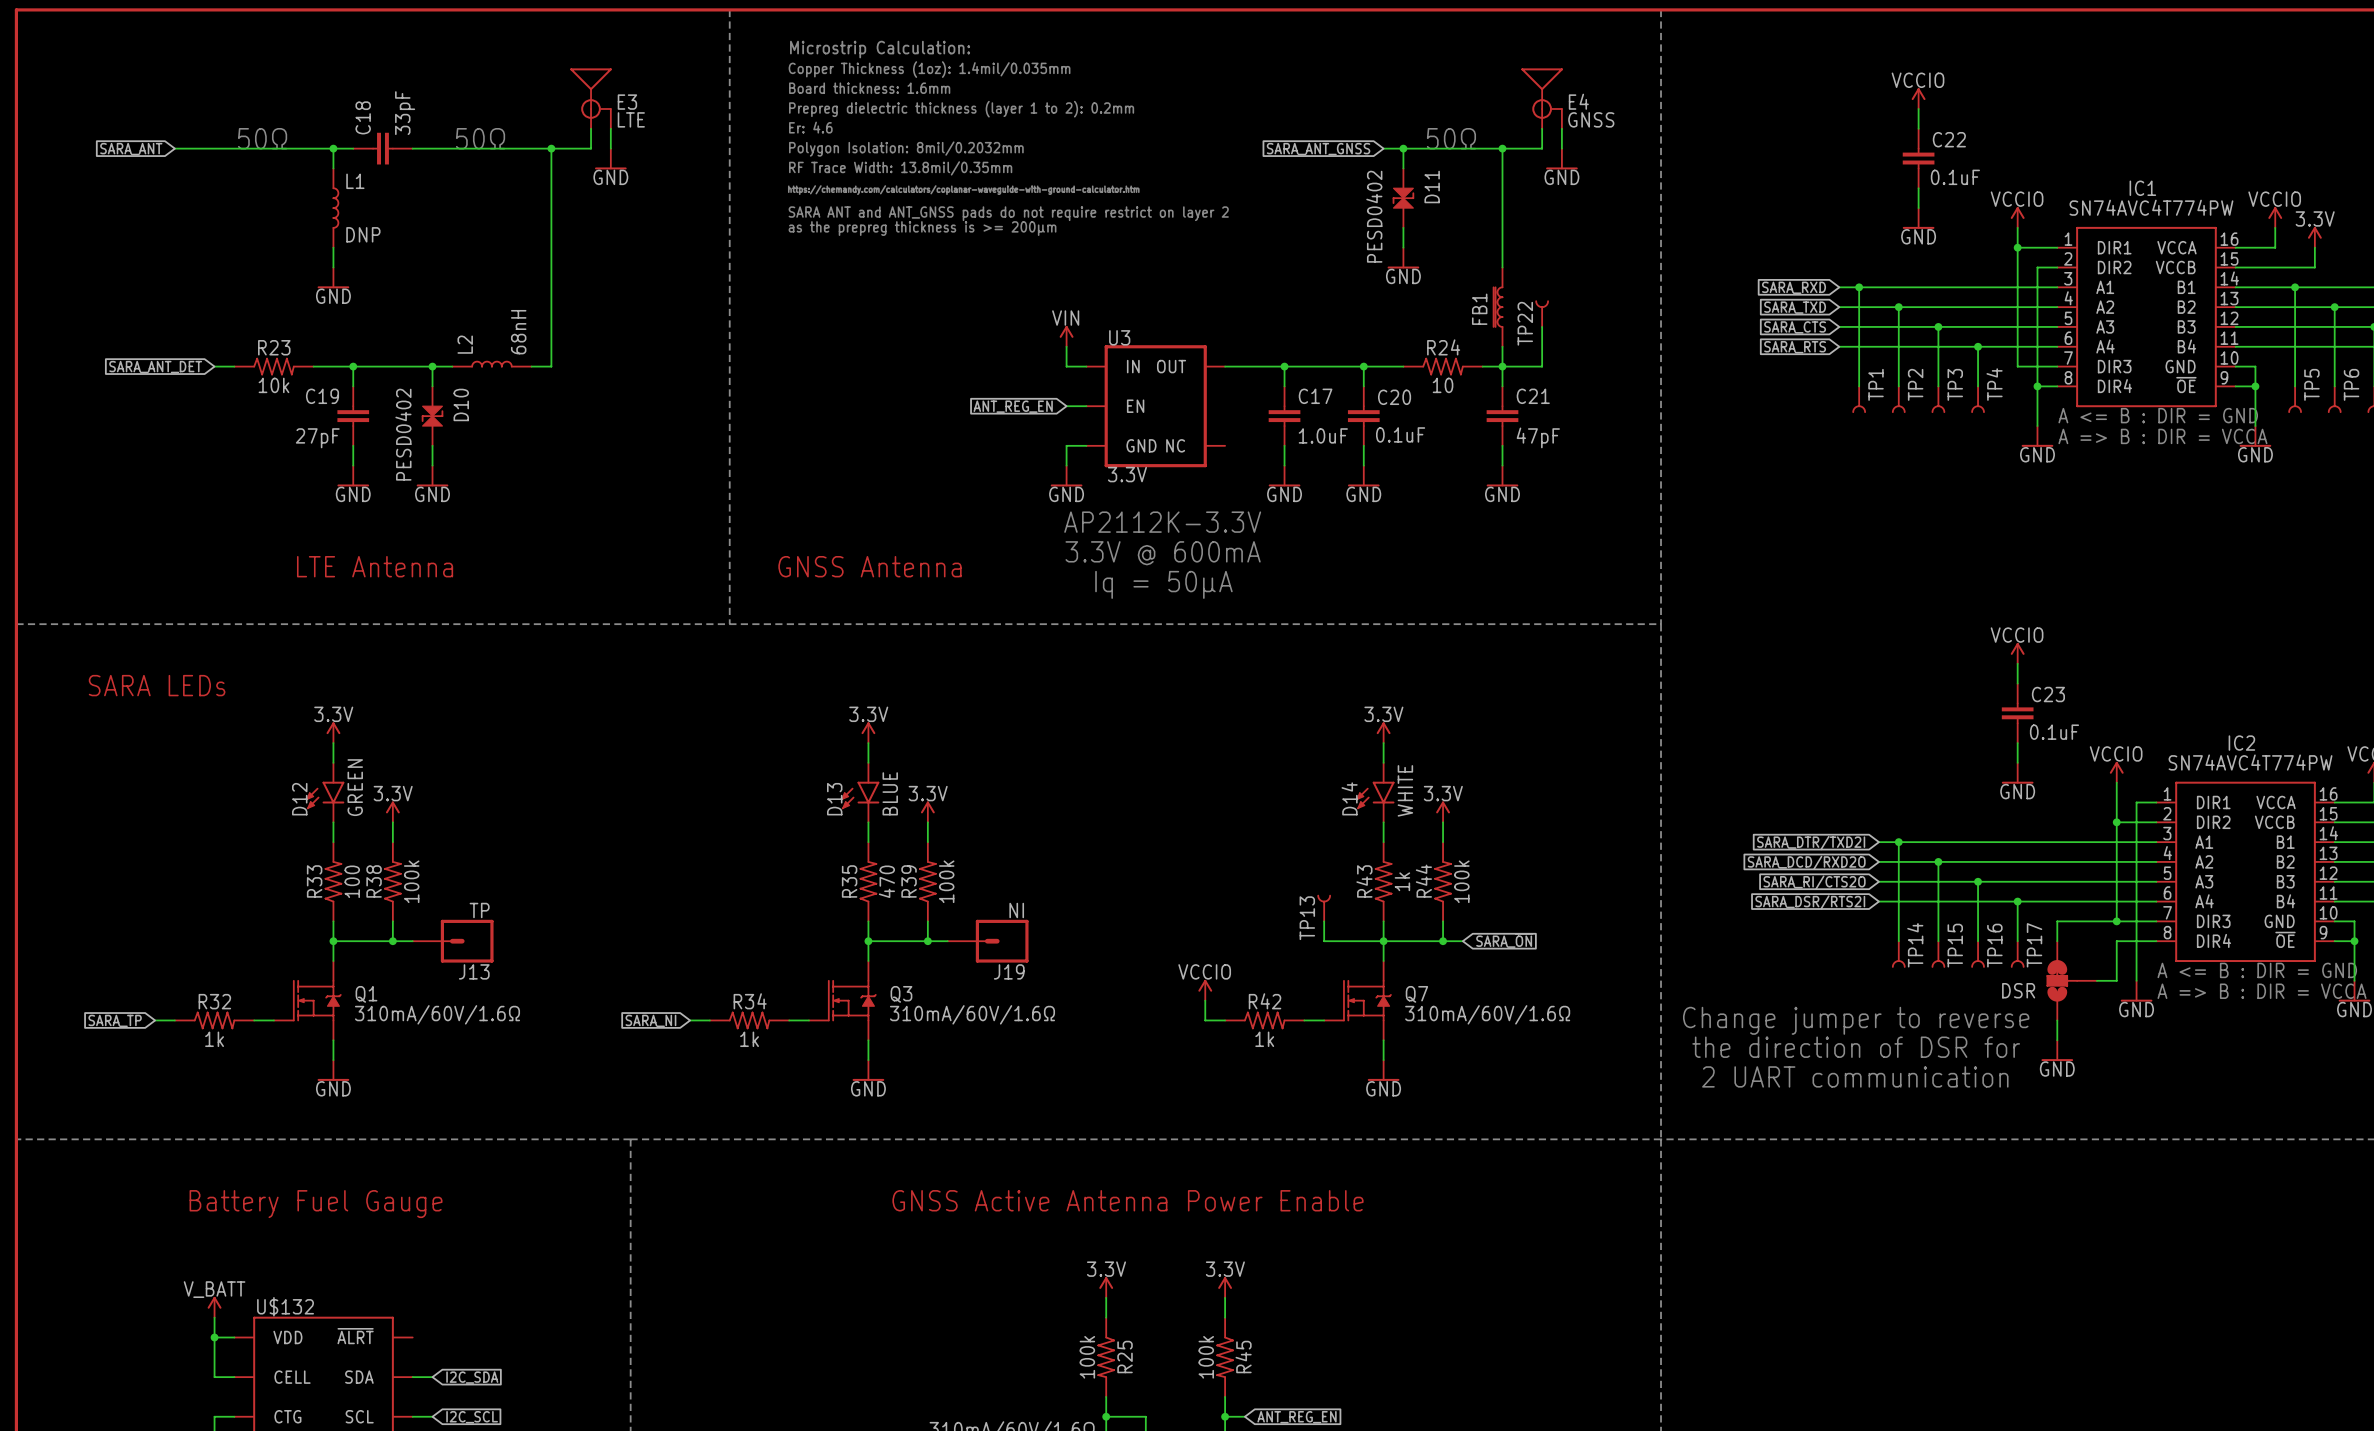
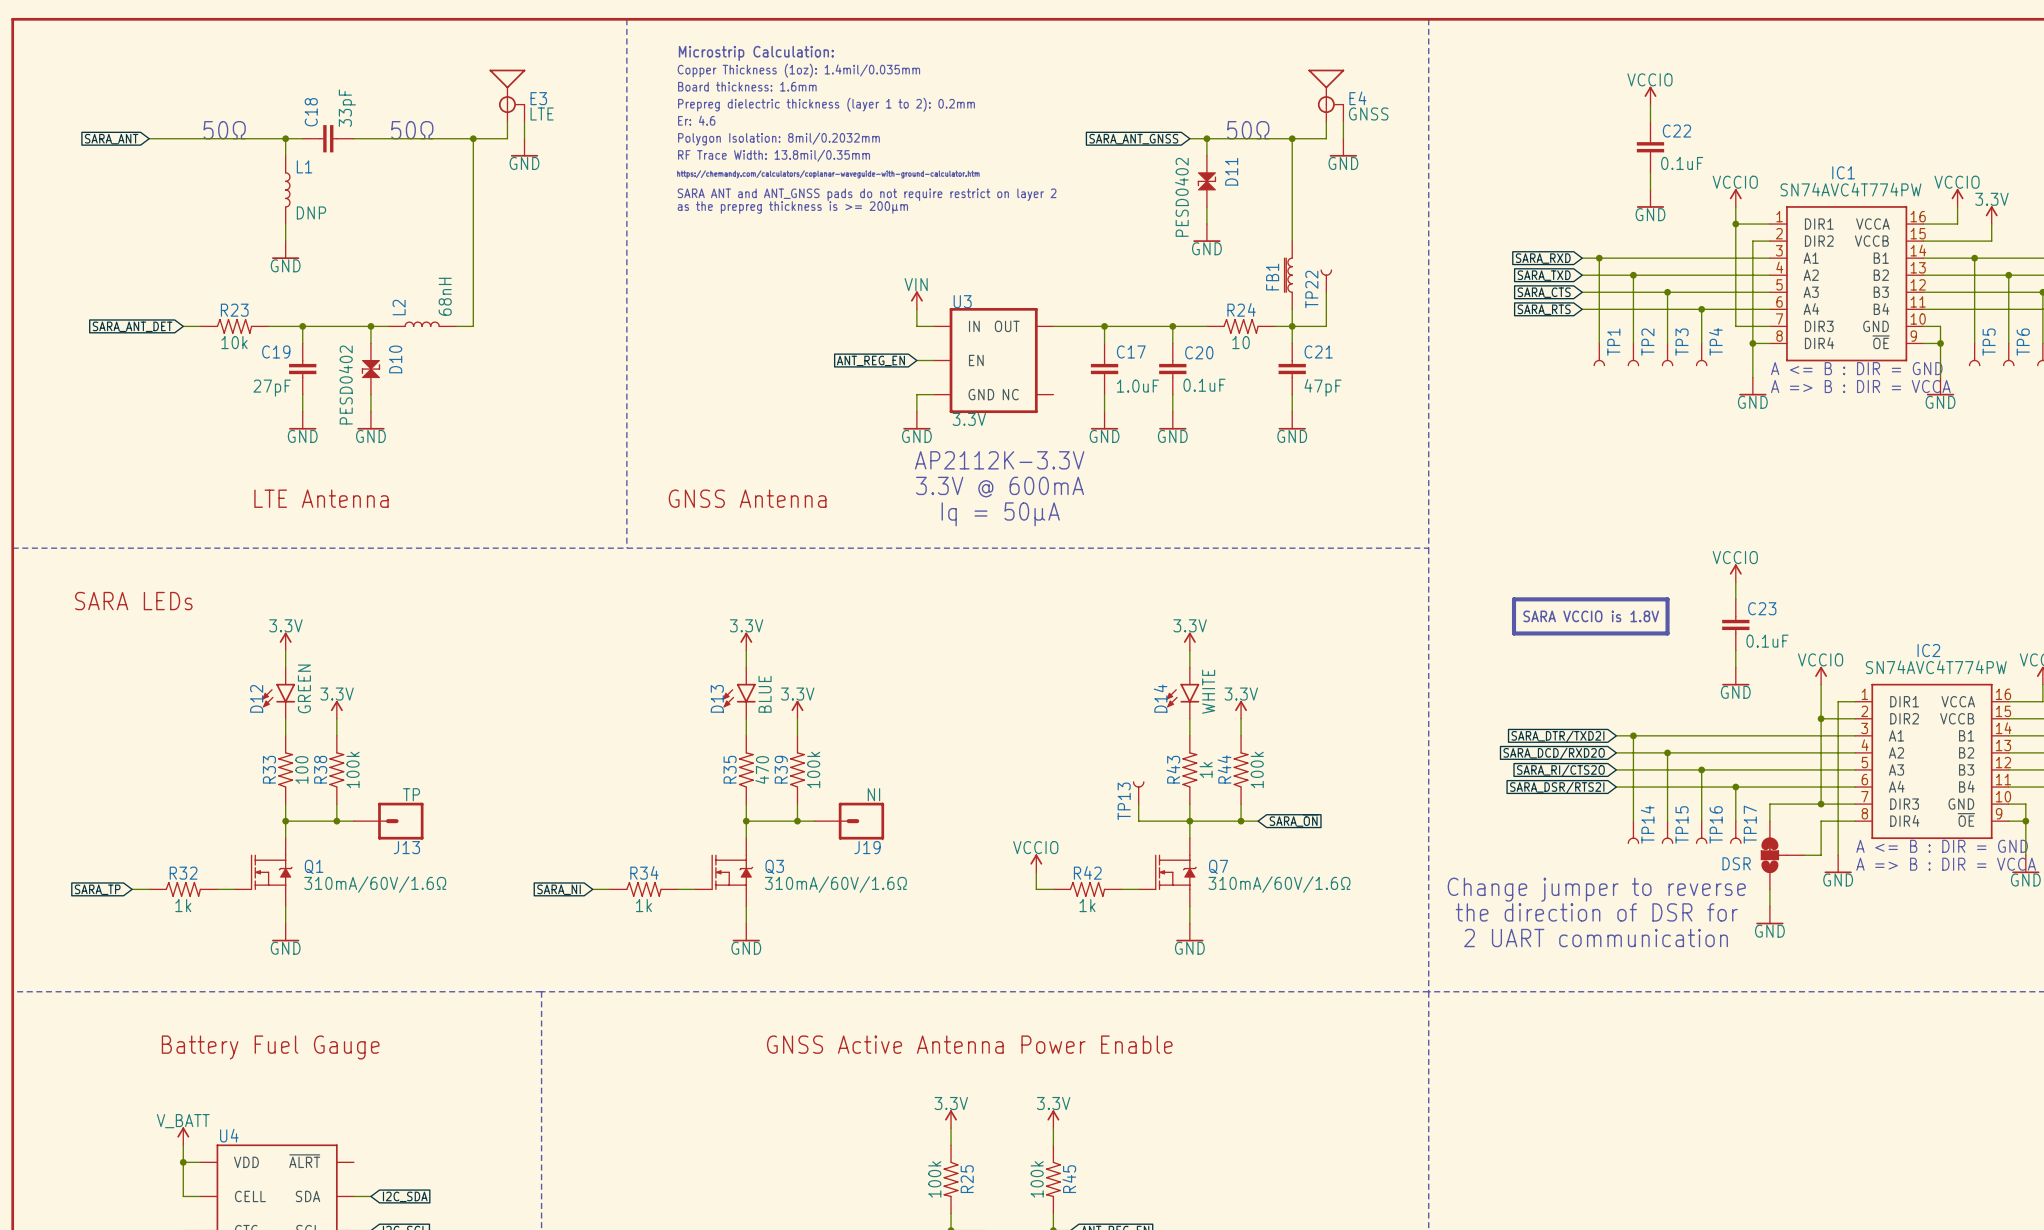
line: none -> (1514, 599) (1514, 633) (1667, 633) (1667, 599) (1514, 599)
text: none -> SARA VCCIO is 1.8V (1591, 616)
U$132 name: U$132 (285, 1306) -> U4 (229, 1135)

